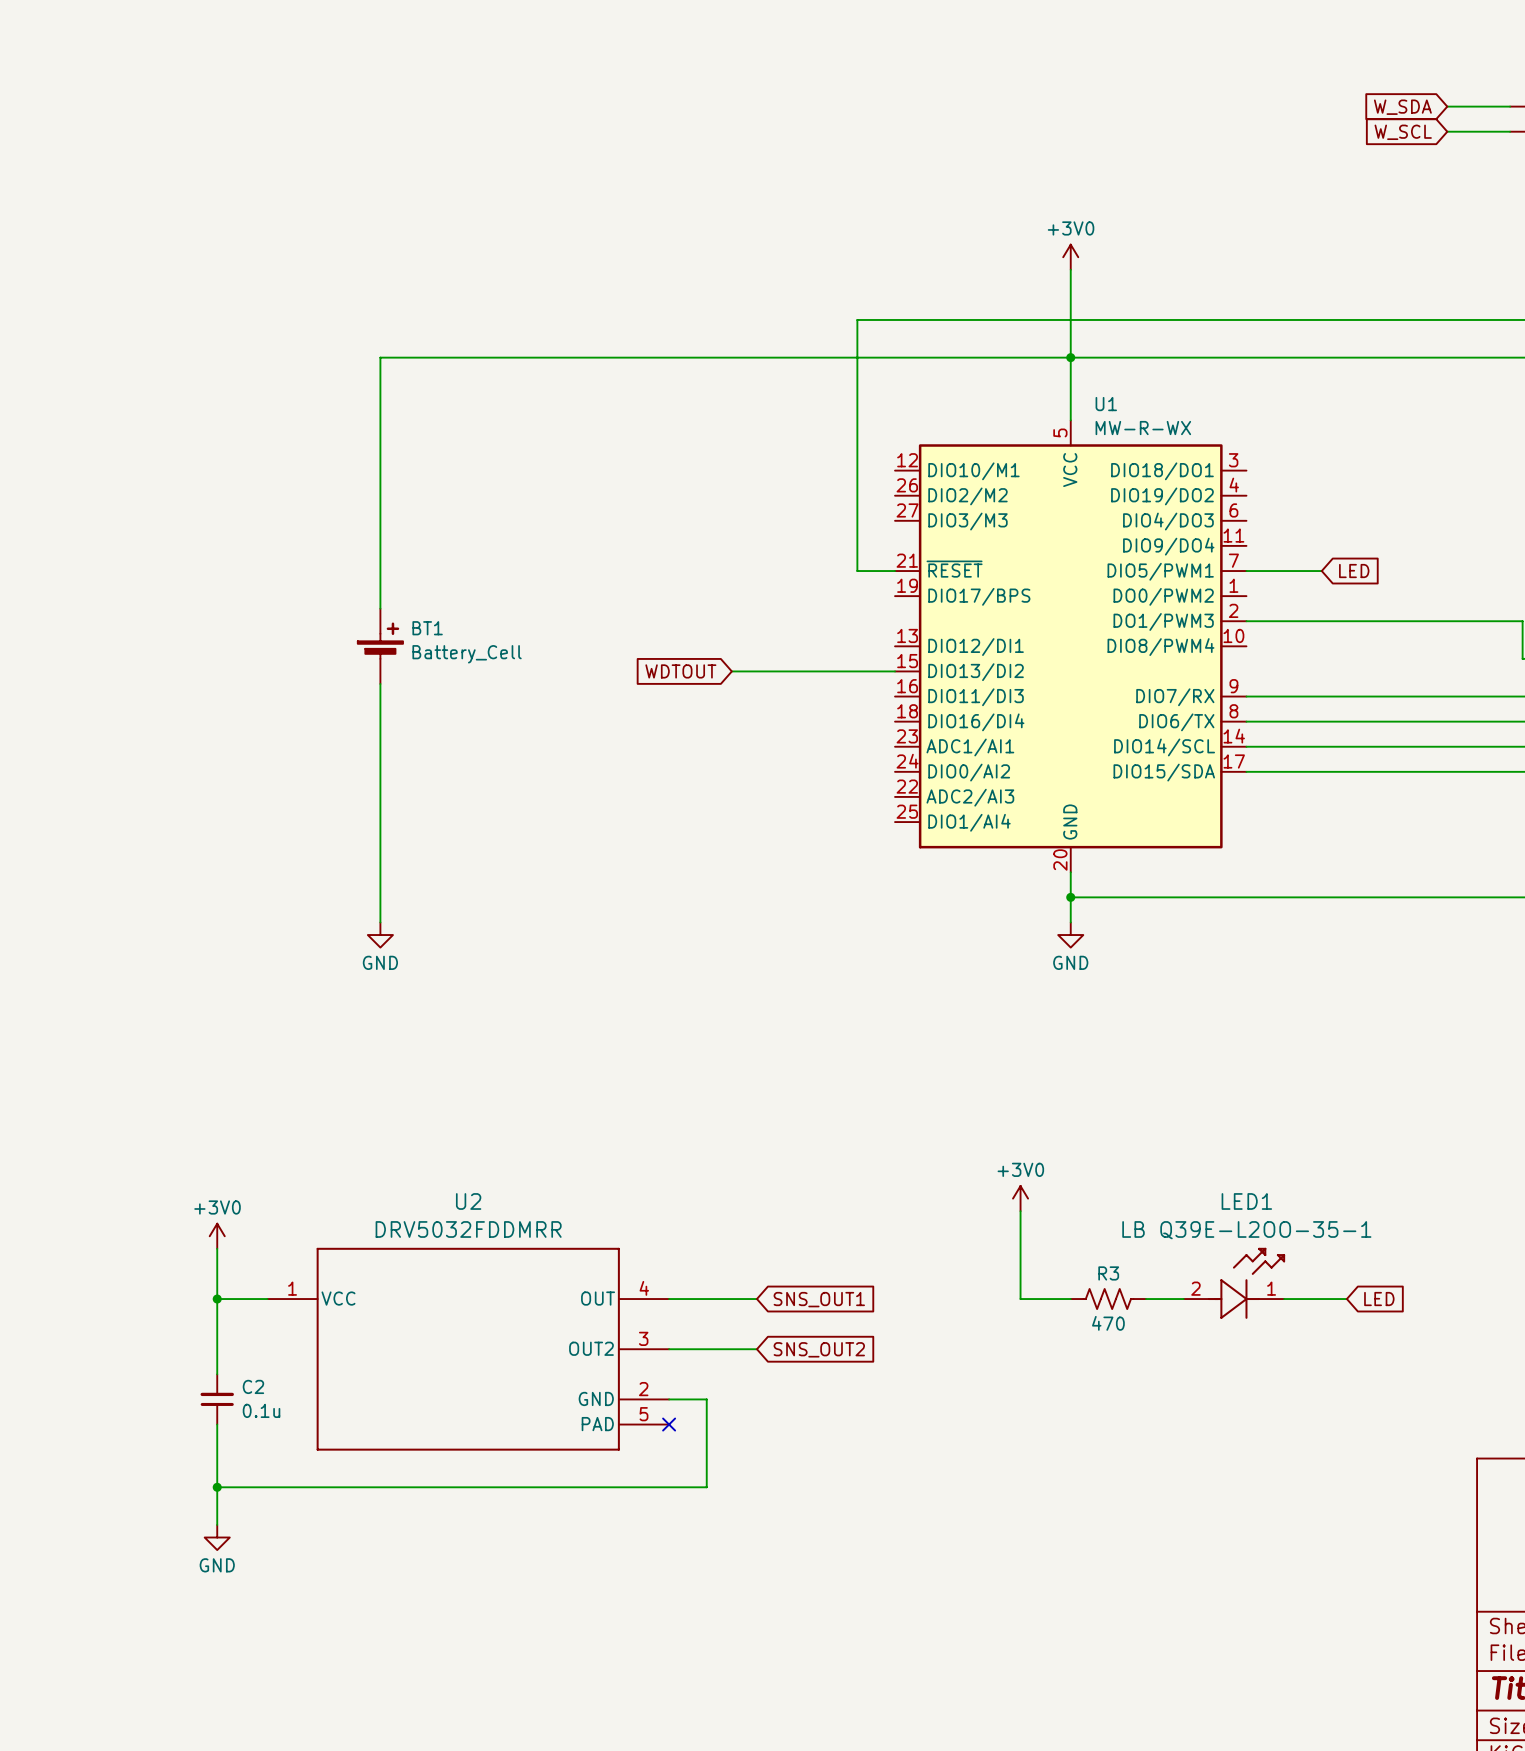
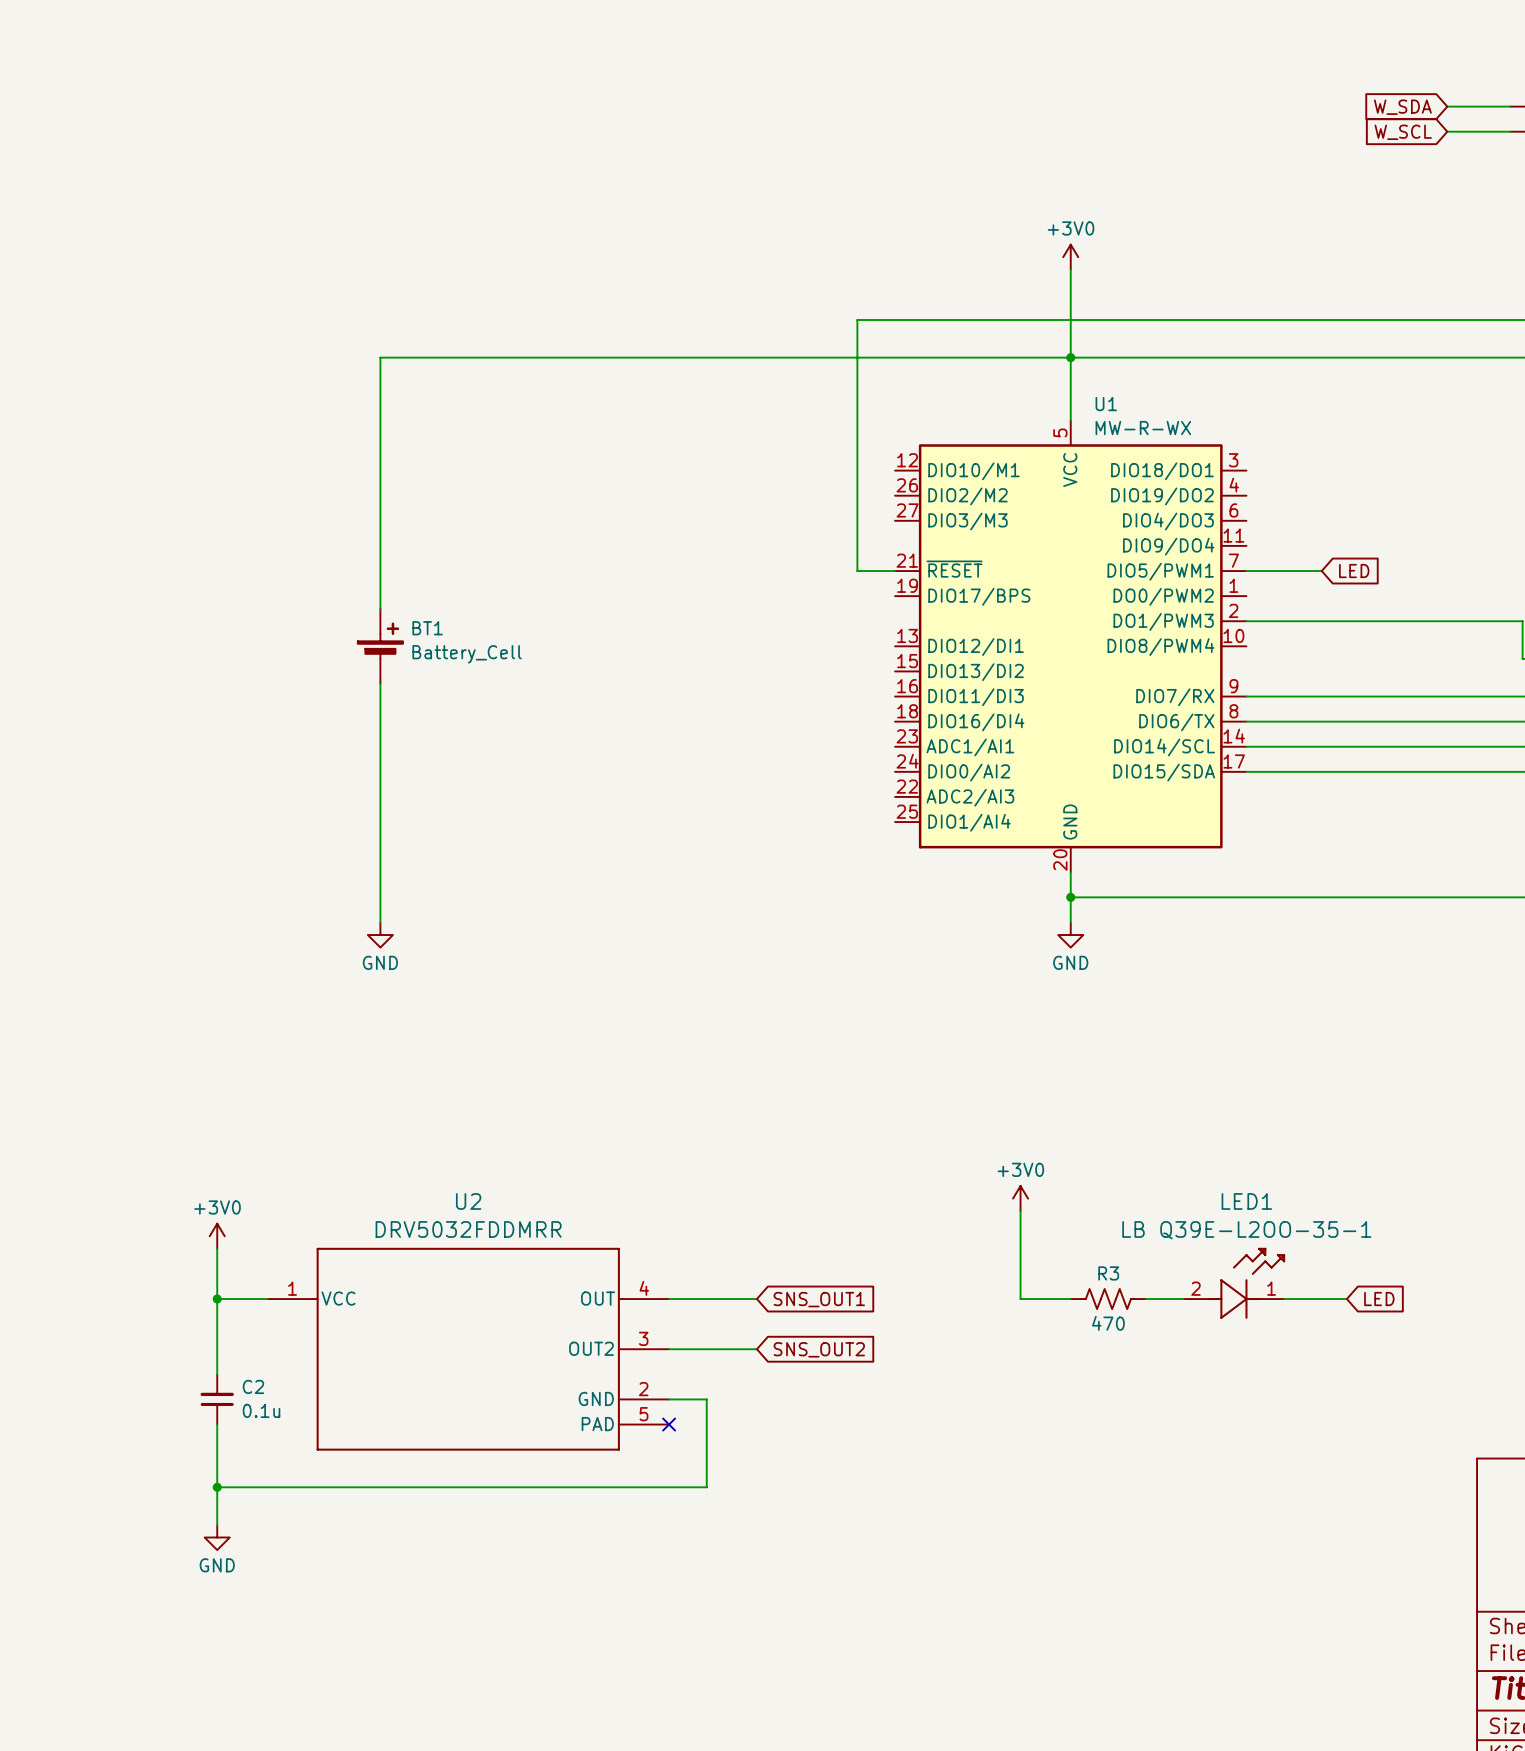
global label: WDTOUT (680, 671) -> none
wire: (731, 671) (895, 671) -> none

